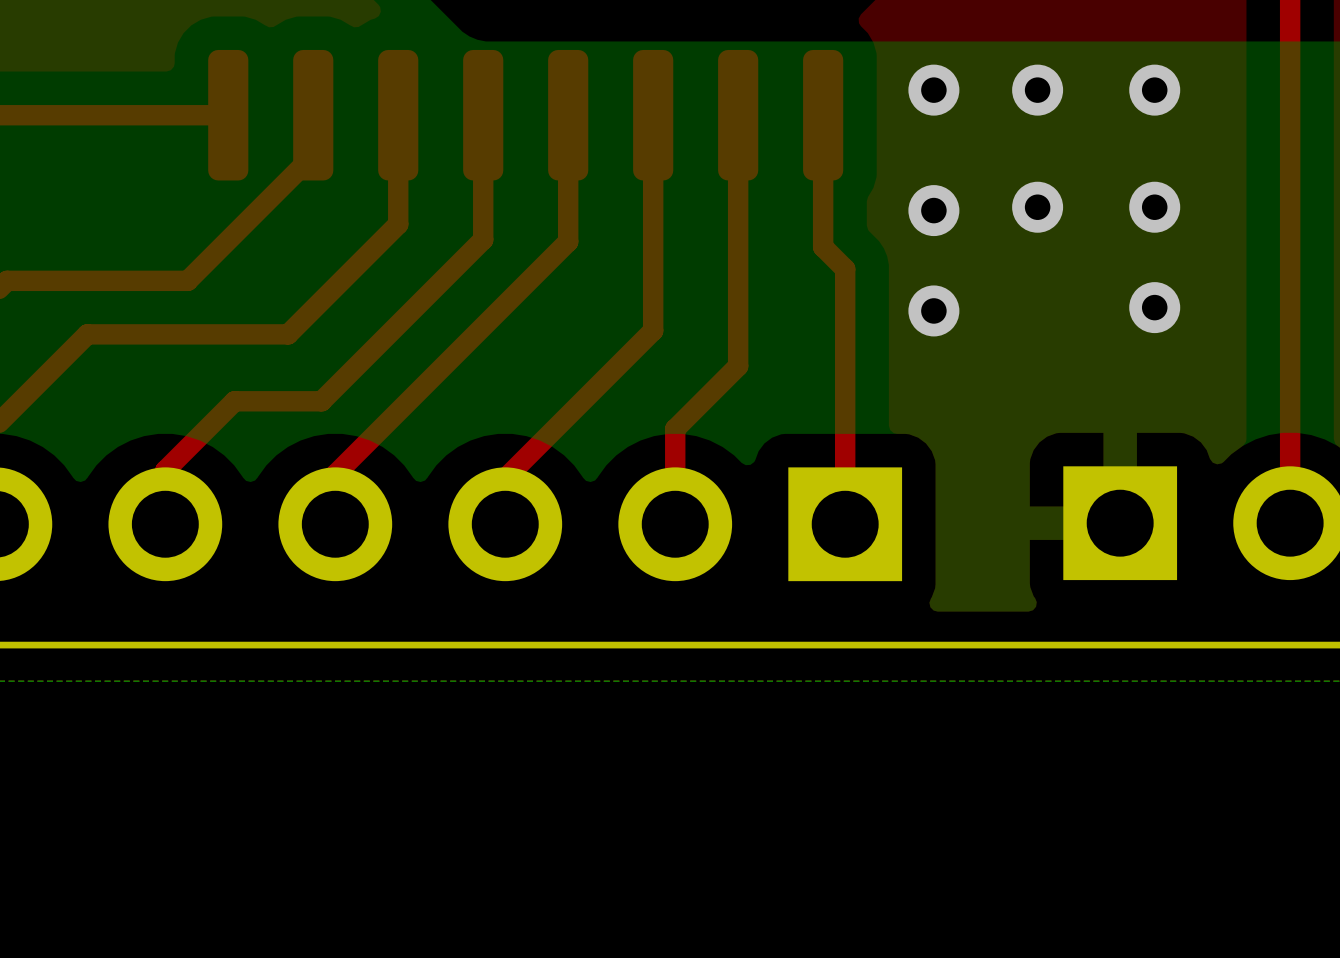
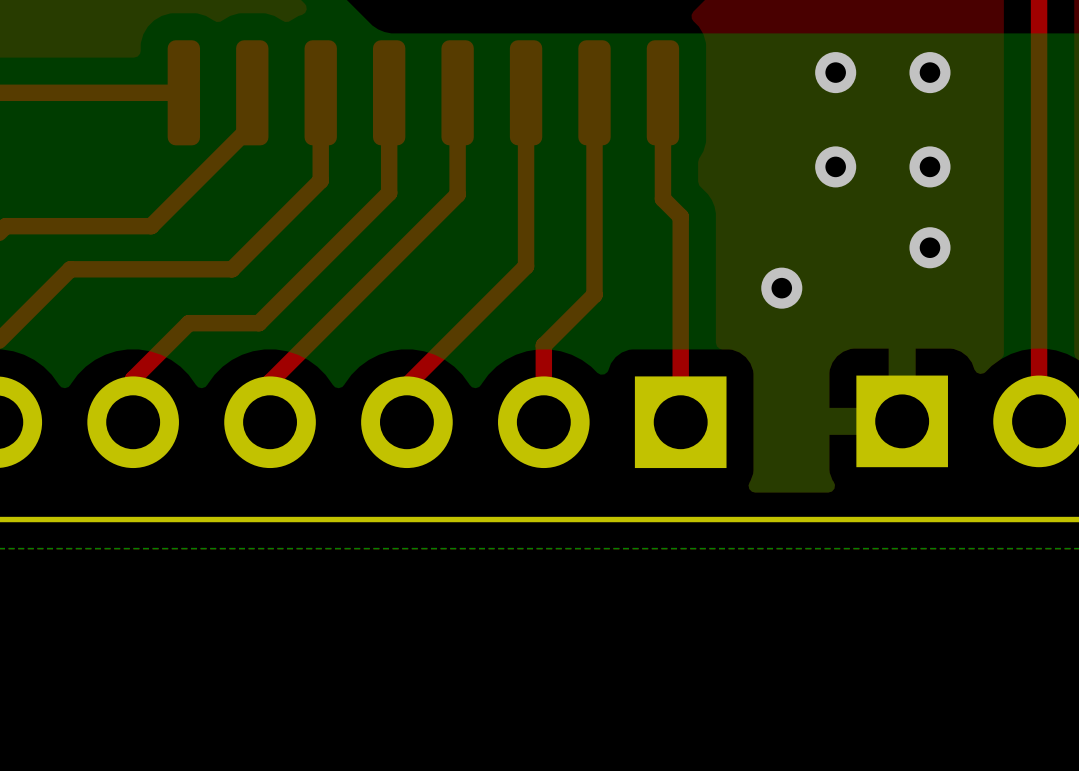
via: (933, 90) -> none
via: (933, 210) -> none
via position: (933, 310) -> (781, 288)

